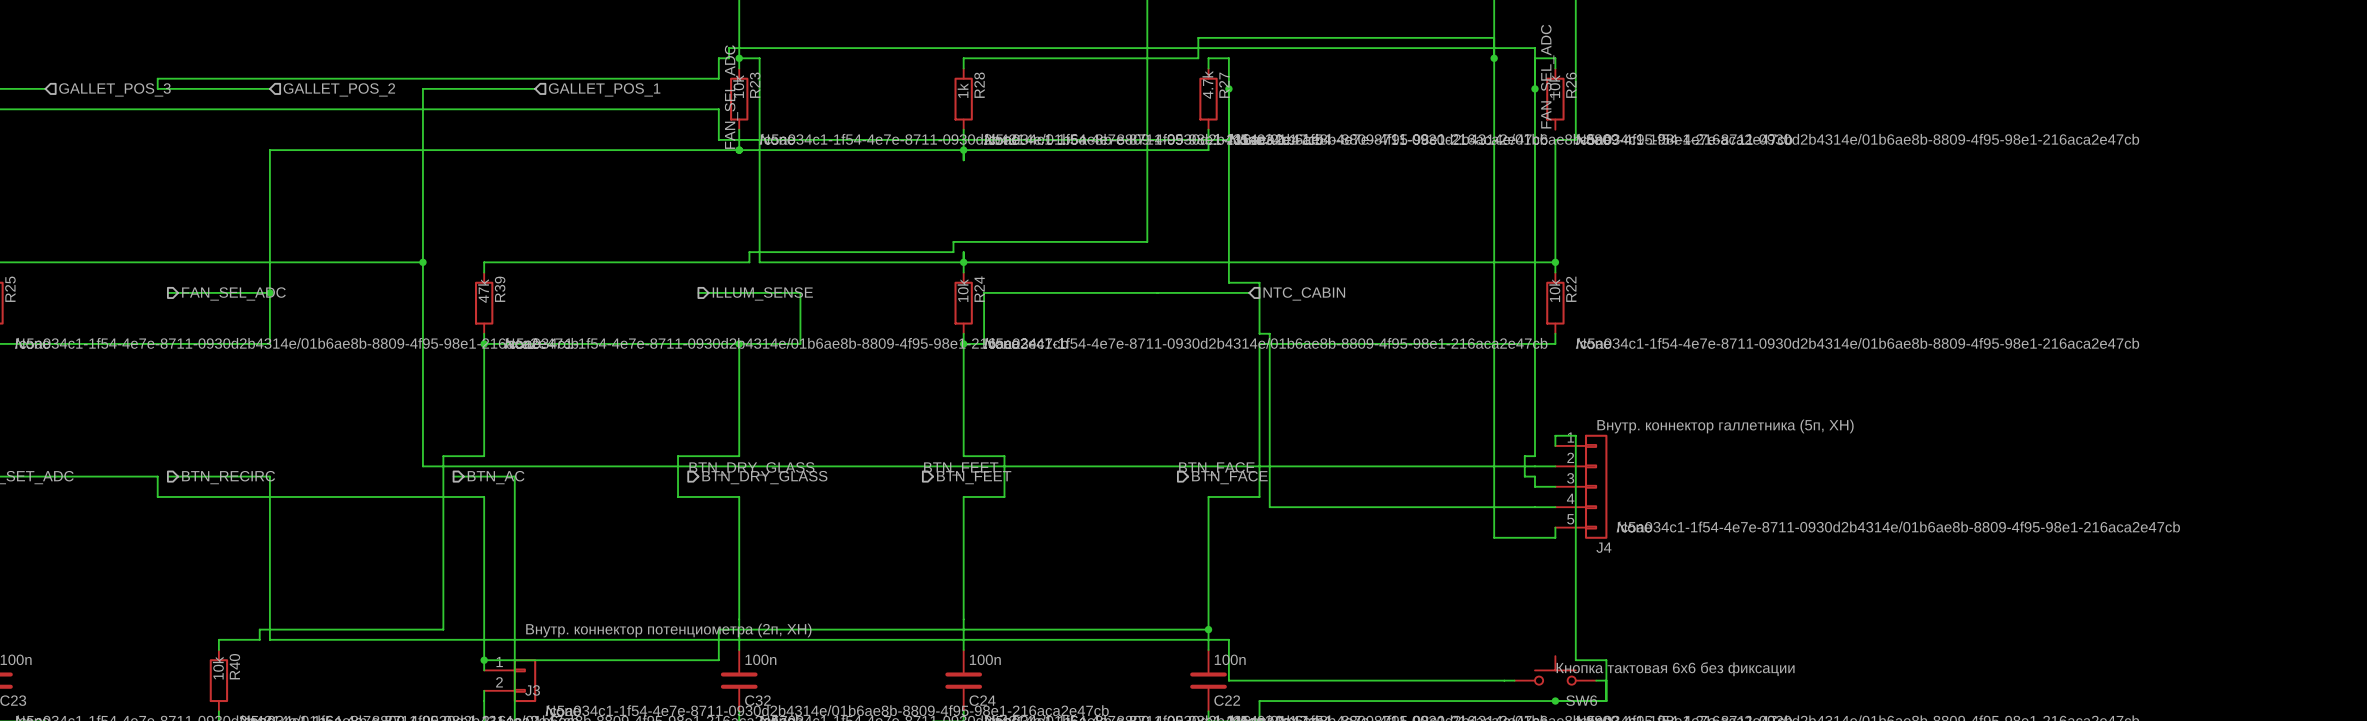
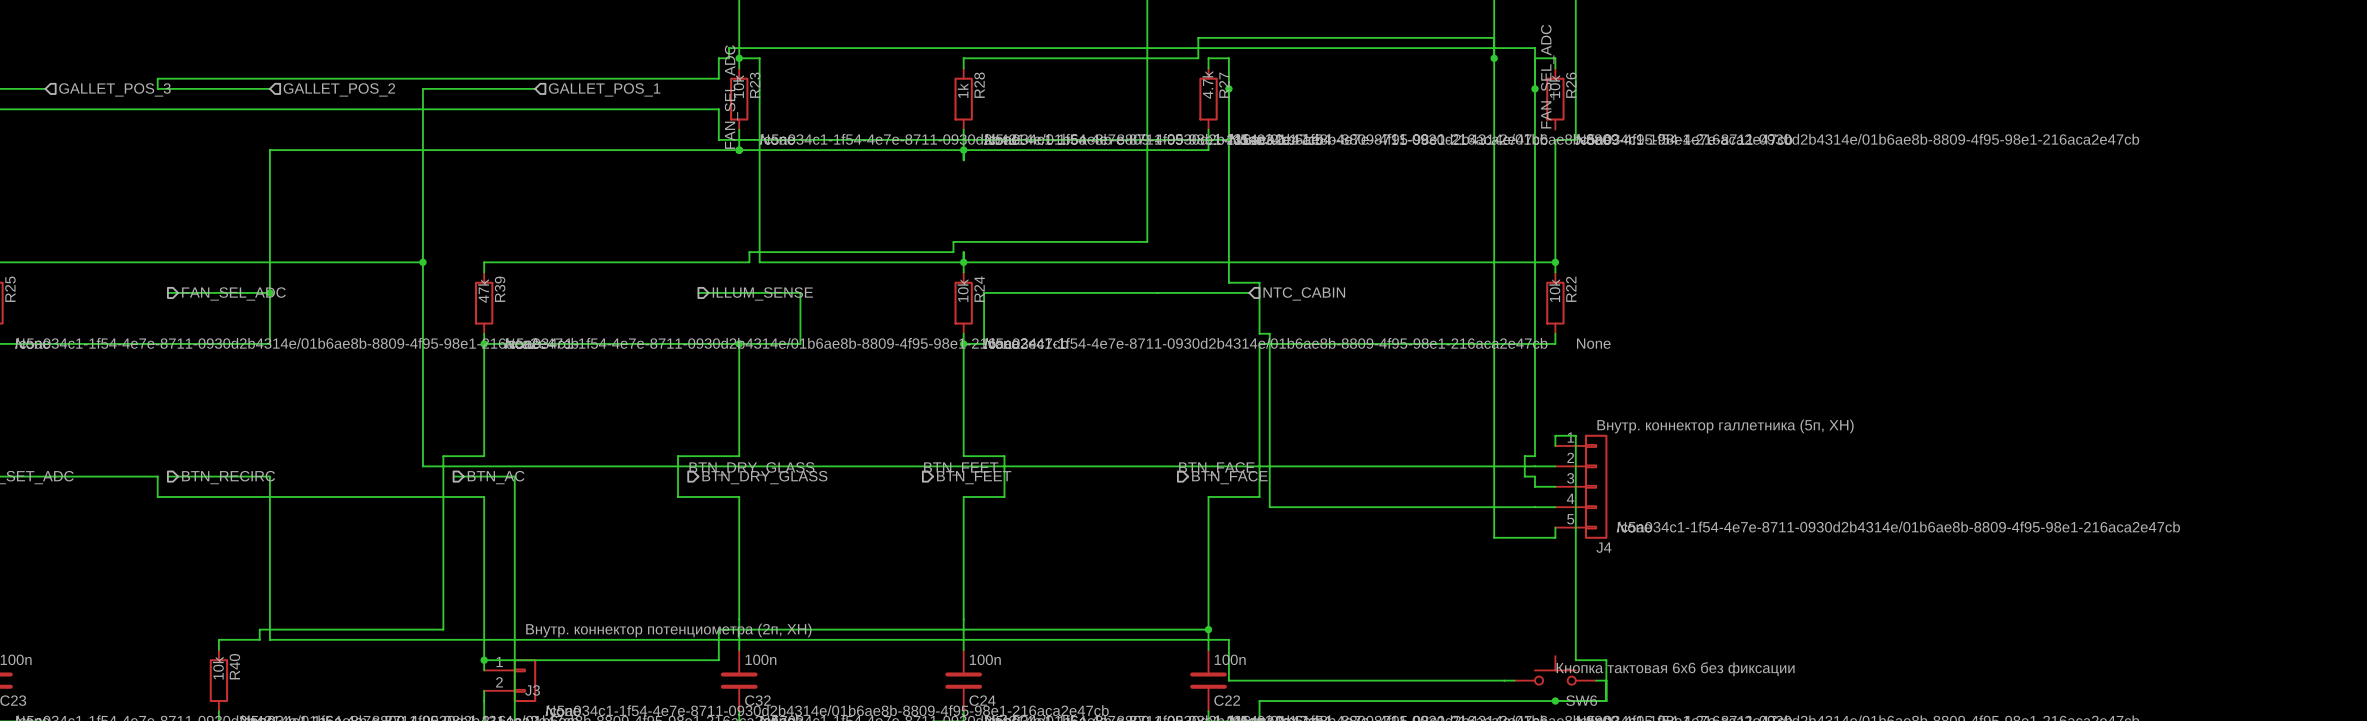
R22 text: /c5a034c1-1f54-4e7e-8711-0930d2b4314e/01b6ae8b-8809-4f95-98e1-216aca2e47cb (1857, 343) -> none

